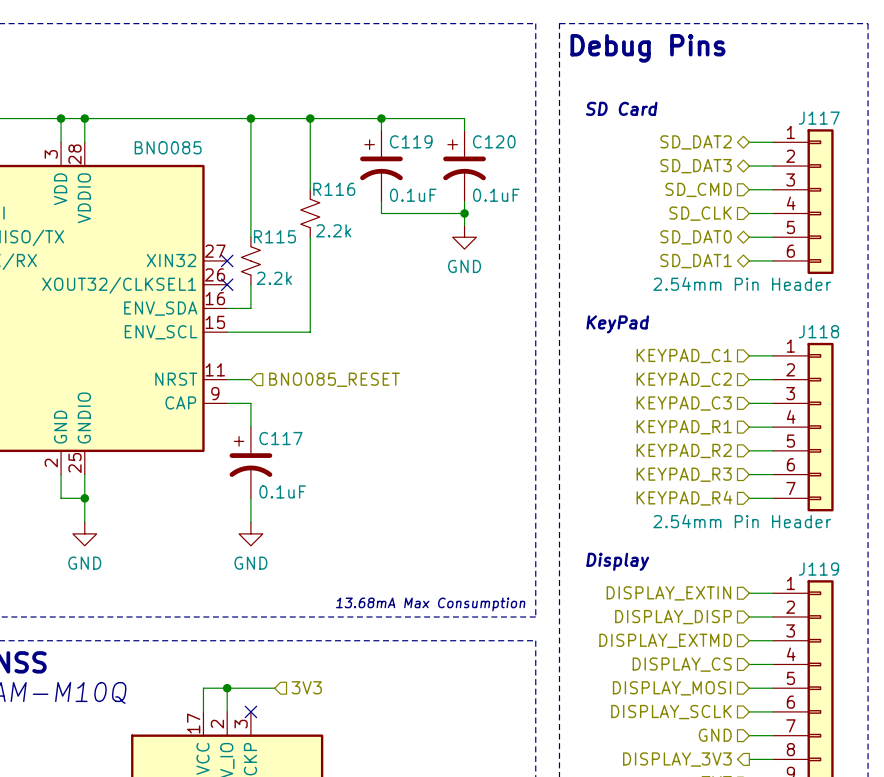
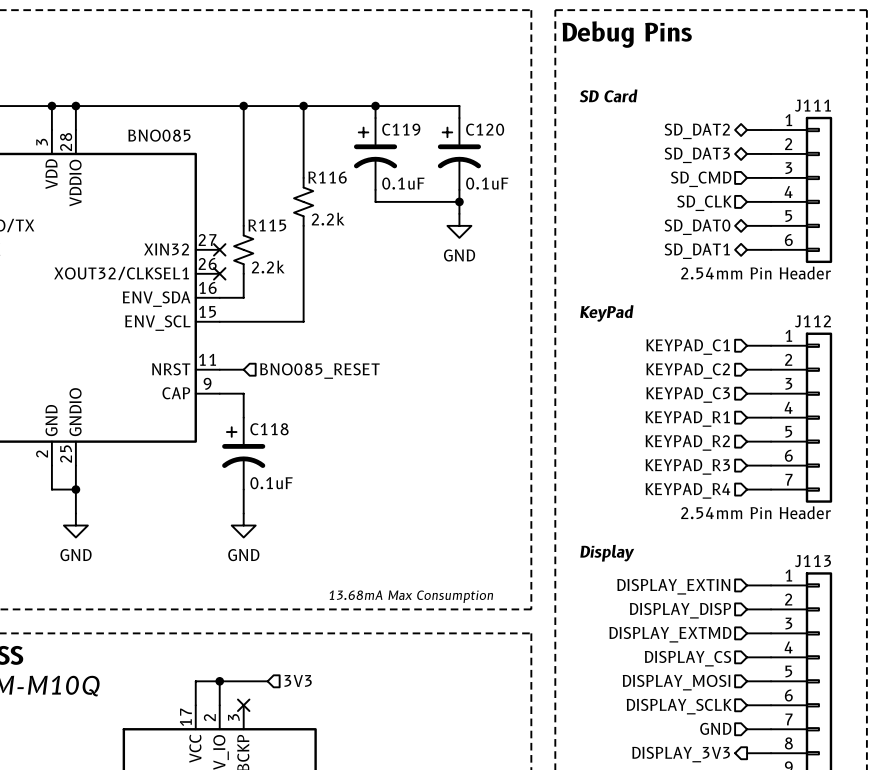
J117 name: J117 (819, 118) -> J111 (812, 105)
J118 name: J118 (818, 331) -> J112 (812, 321)
C117 name: C117 (280, 438) -> C118 (269, 429)
J119 name: J119 (818, 569) -> J113 (812, 561)

